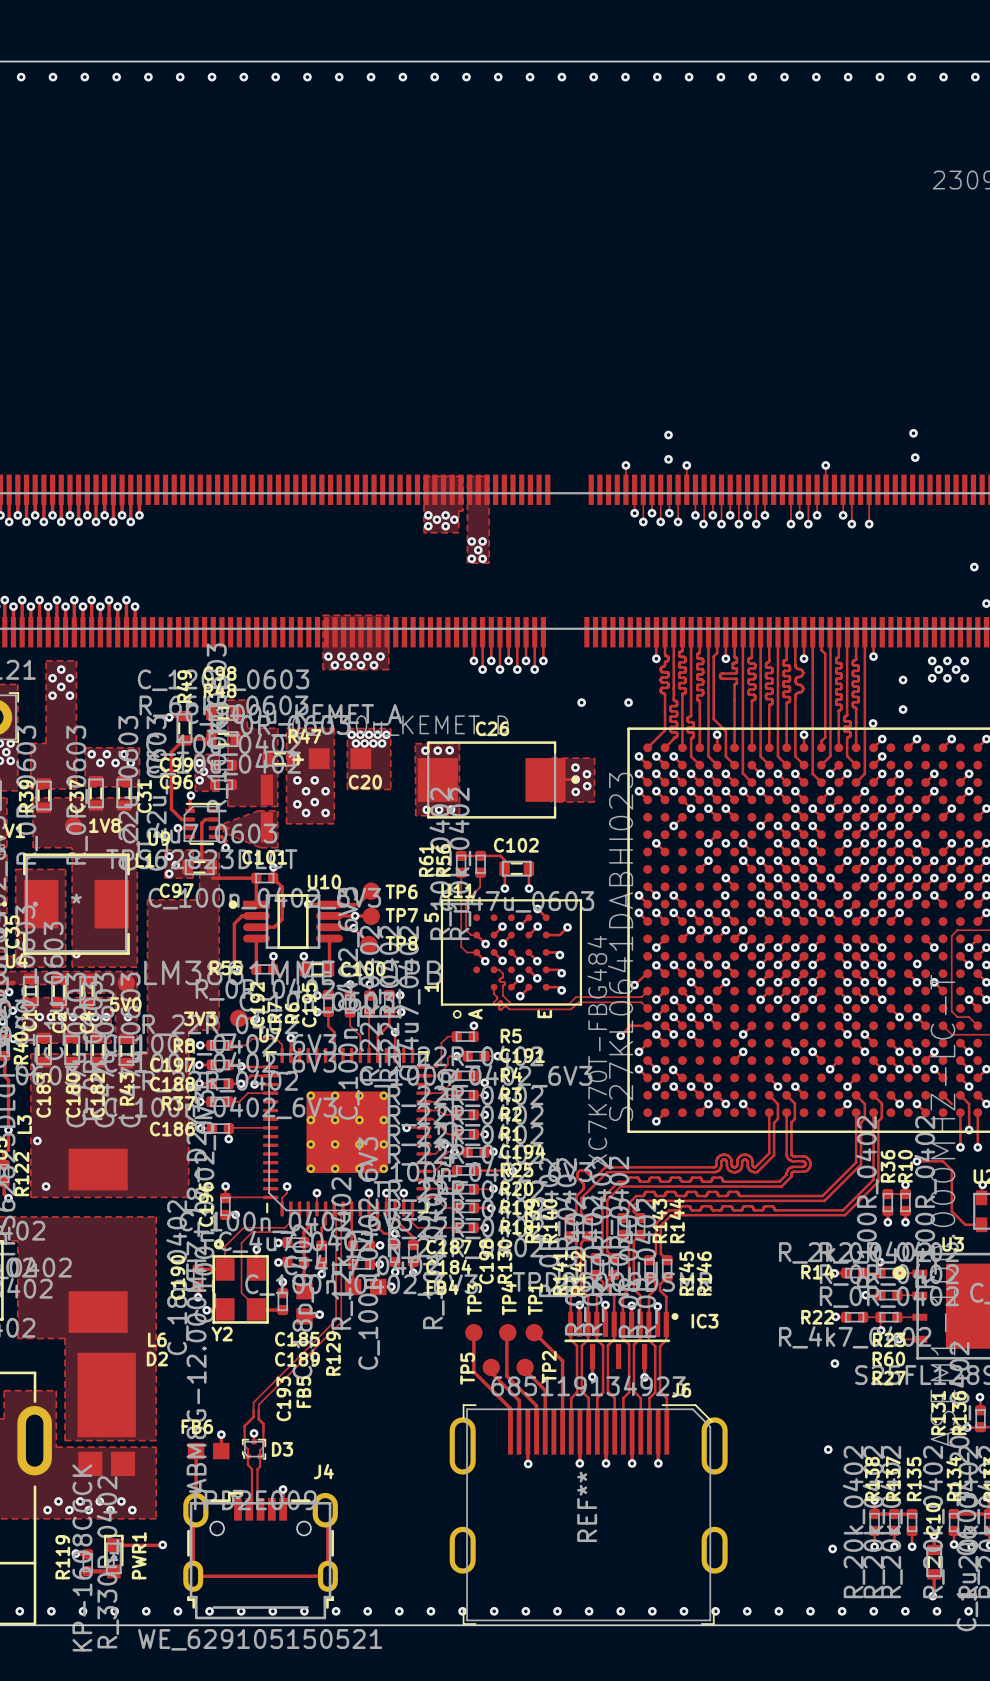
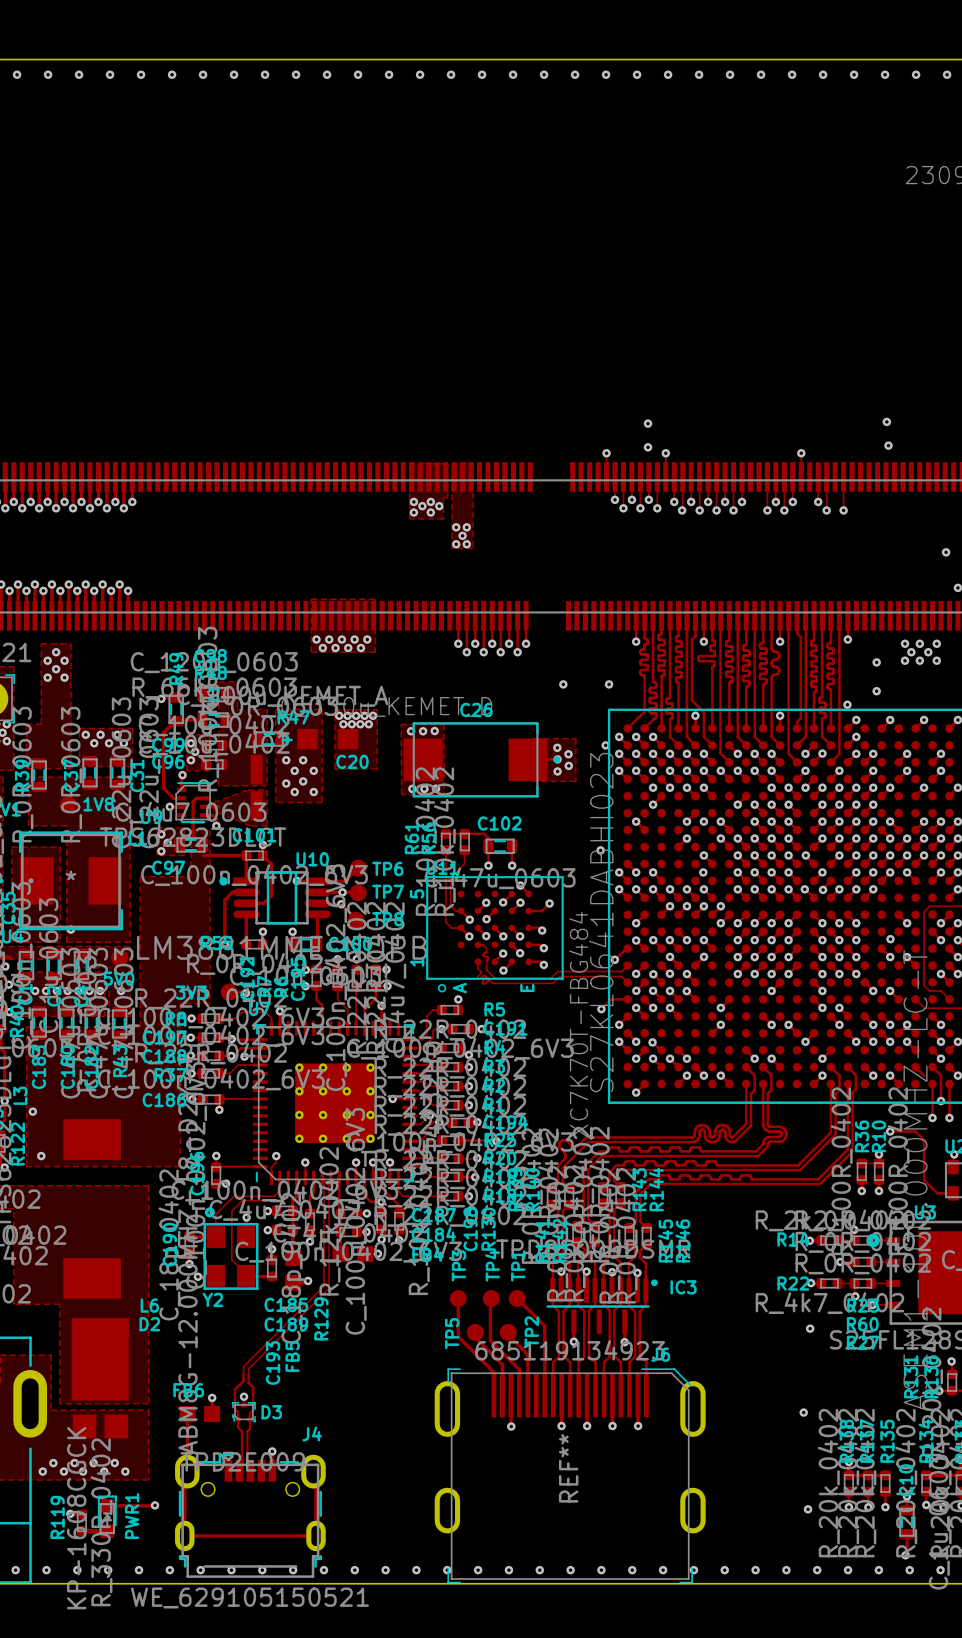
via: none -> (605, 745)
via: none -> (653, 787)
via: none -> (600, 850)

